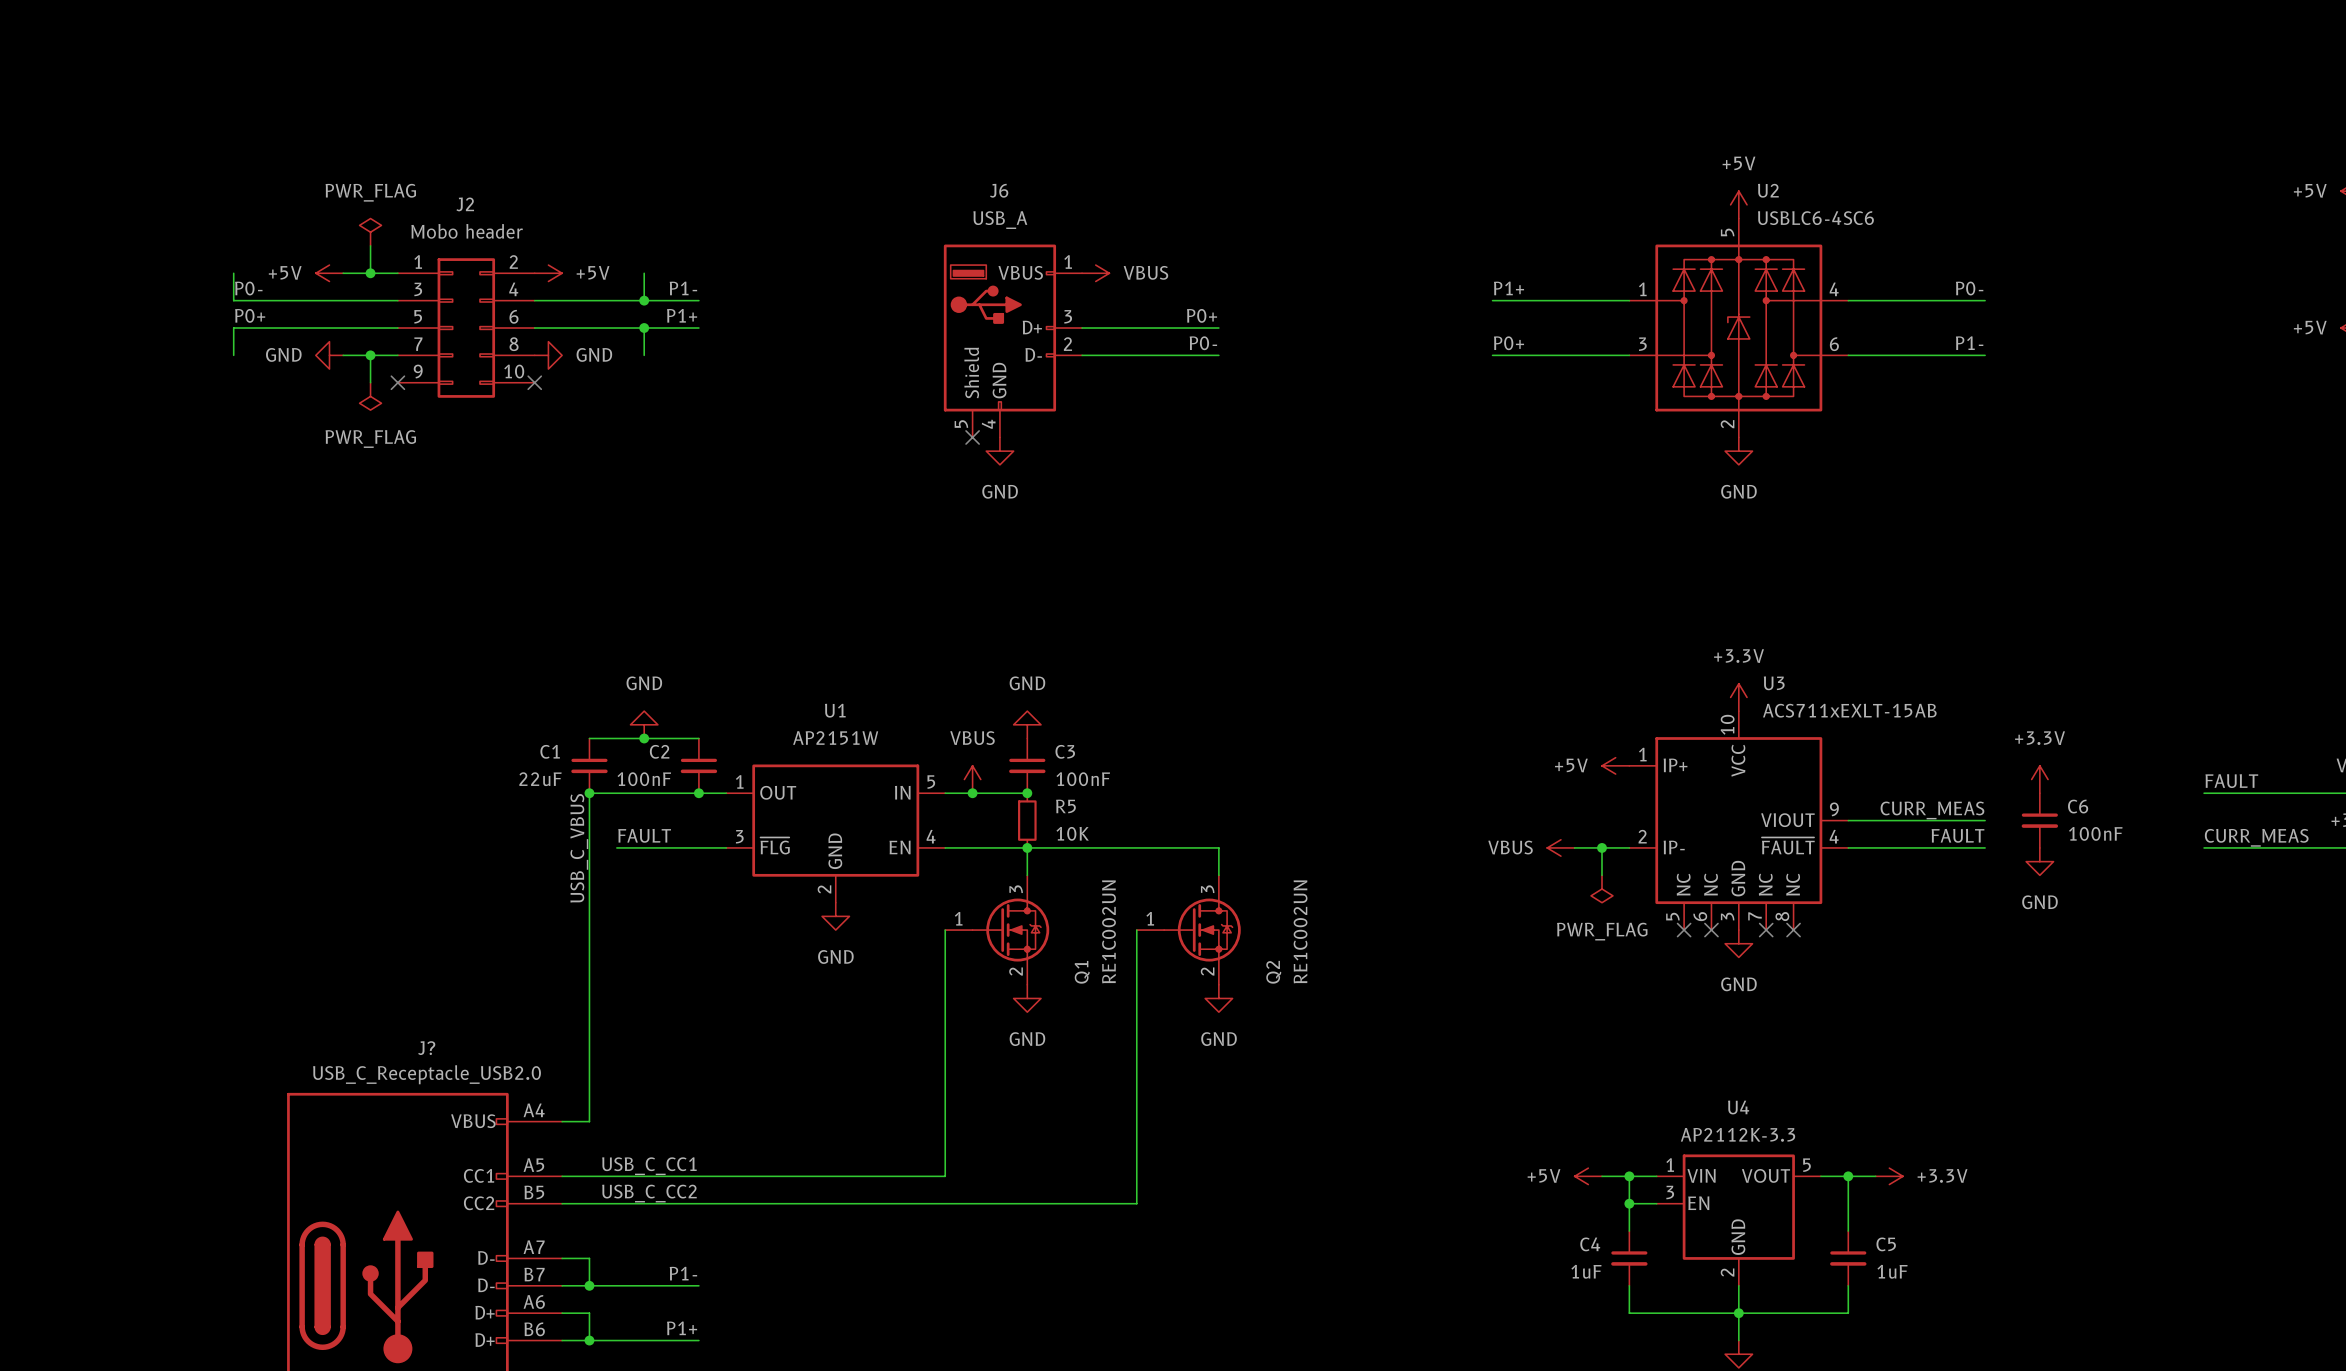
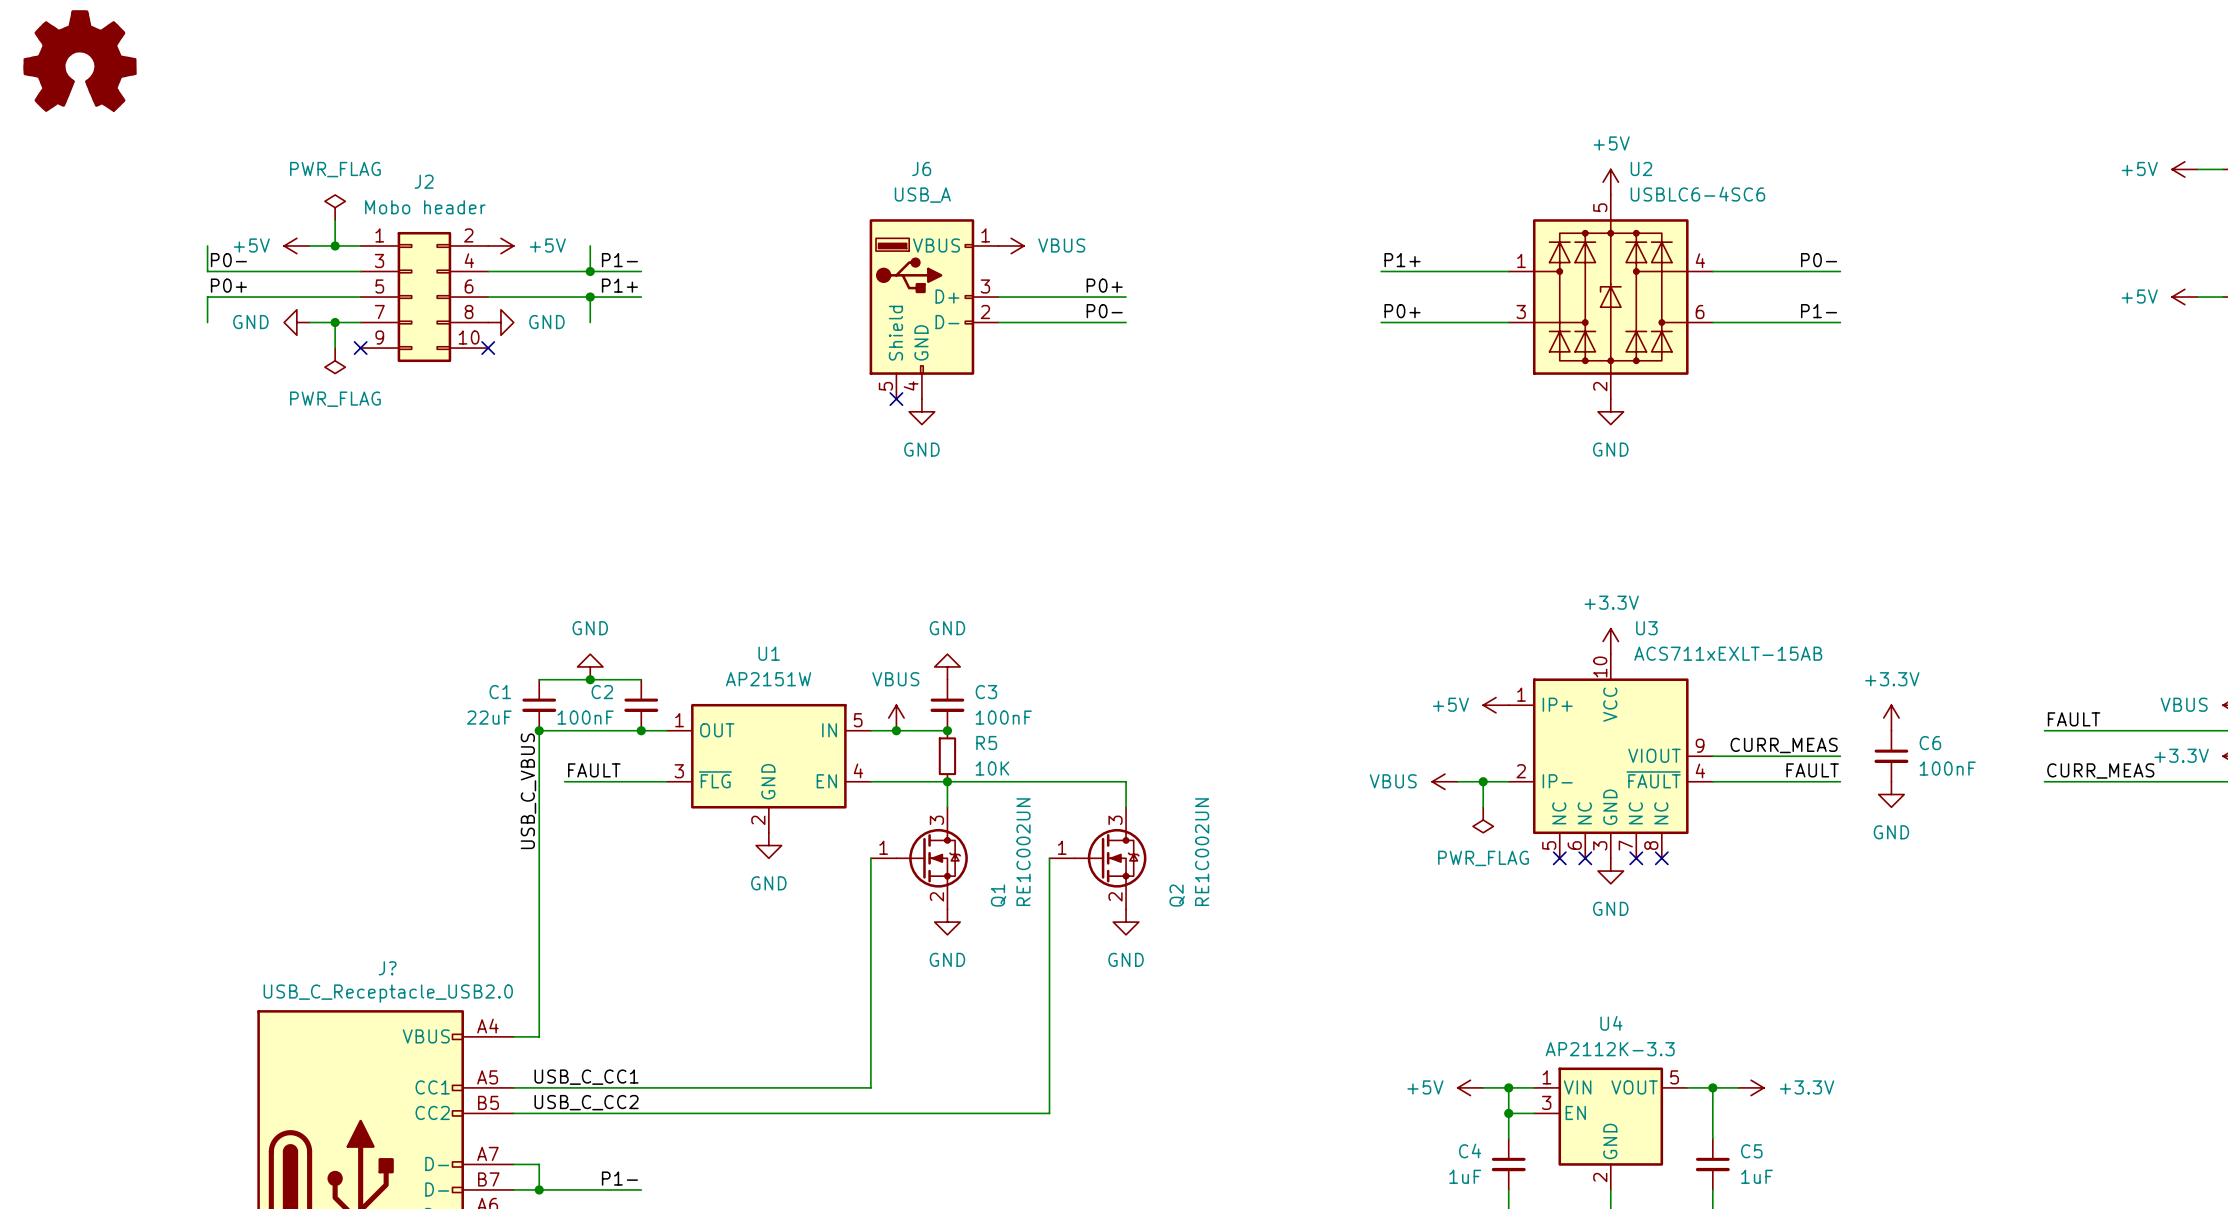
part: none -> (80, 61)

